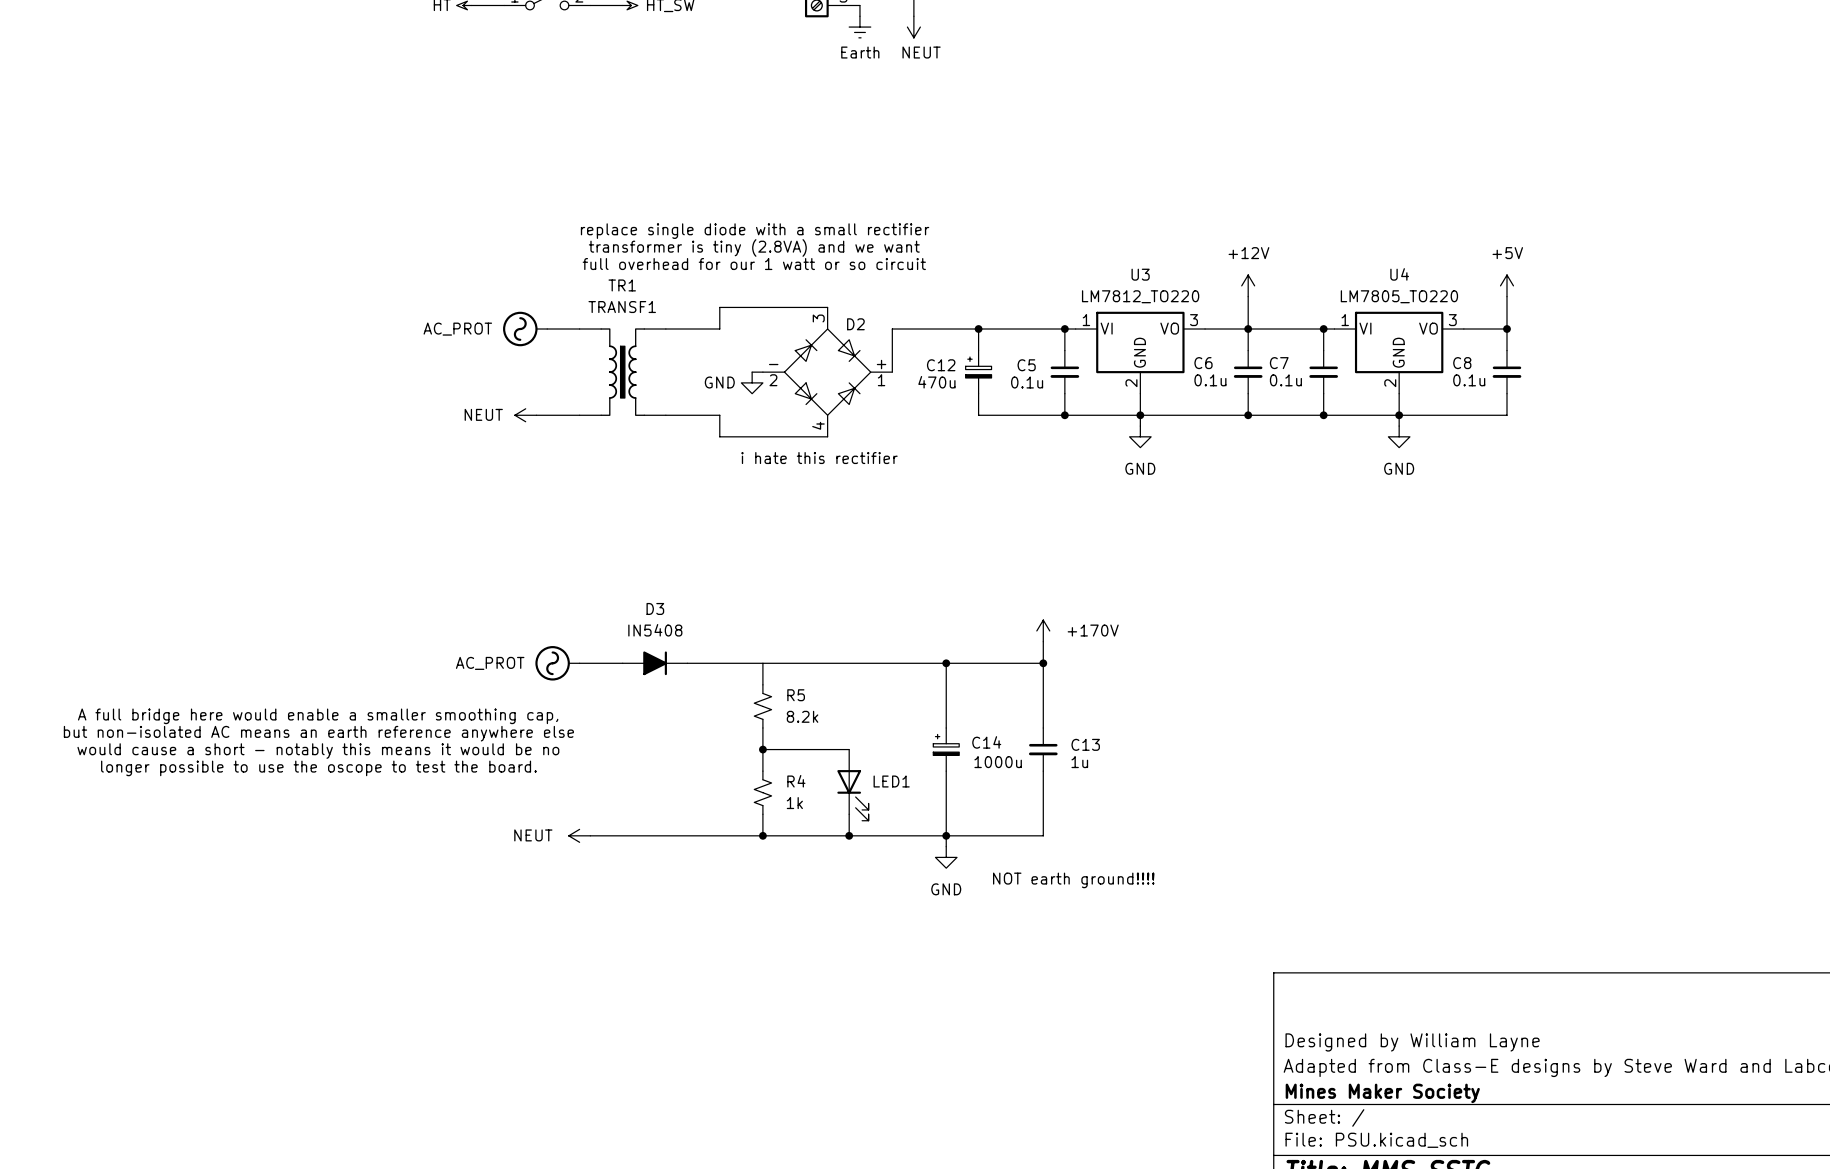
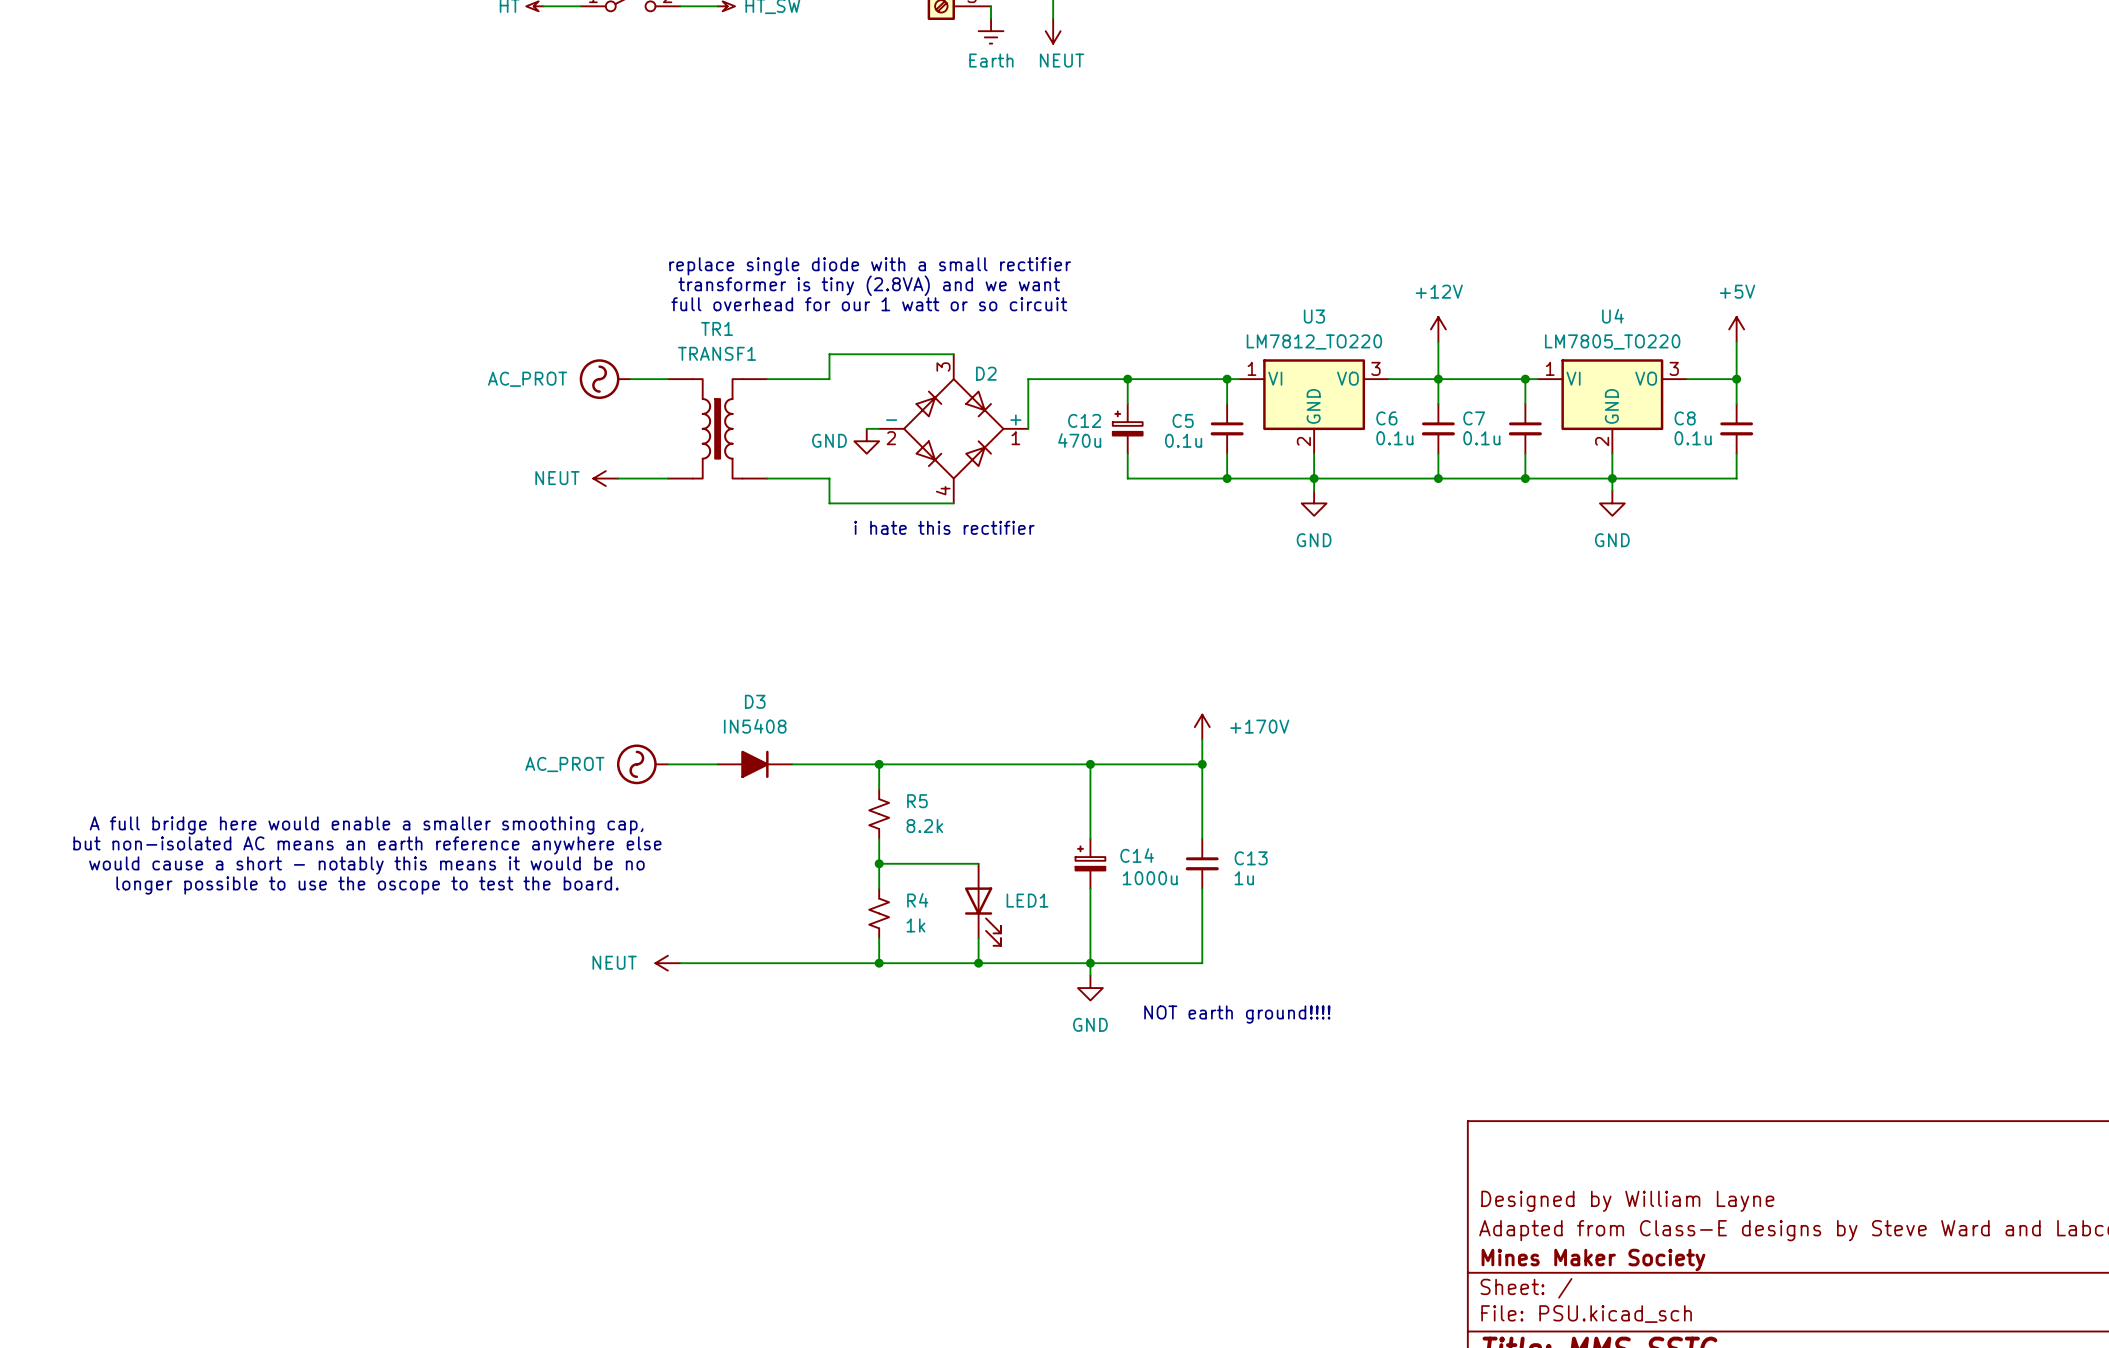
junction: none -> (879, 764)

